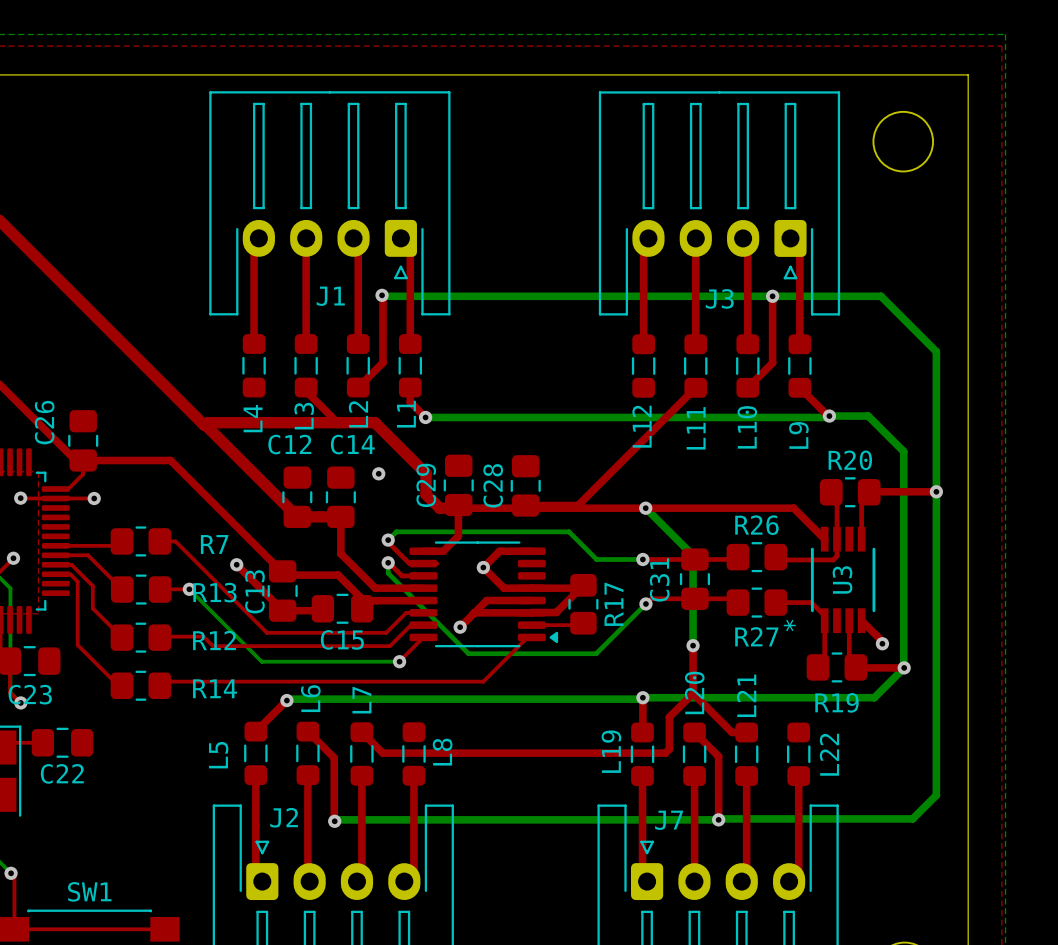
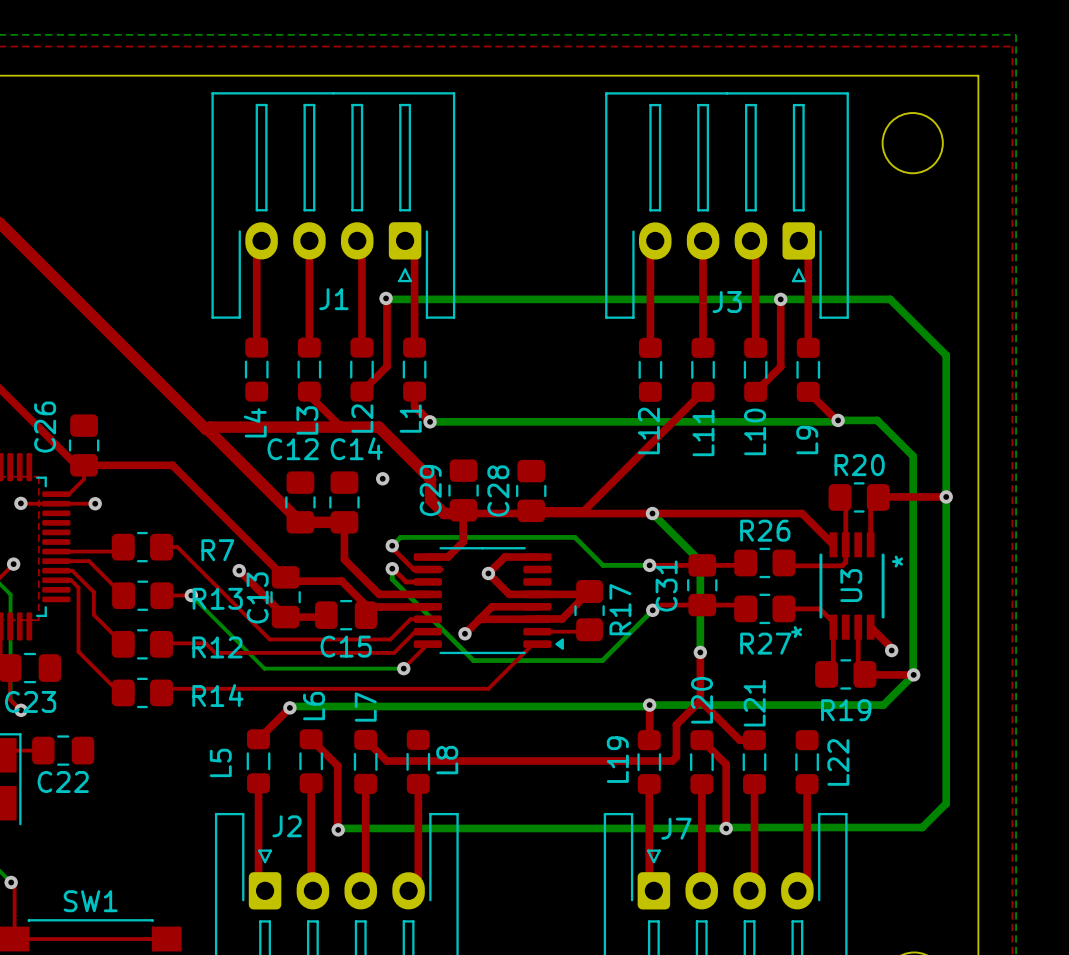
U3 text: none -> * (897, 561)

